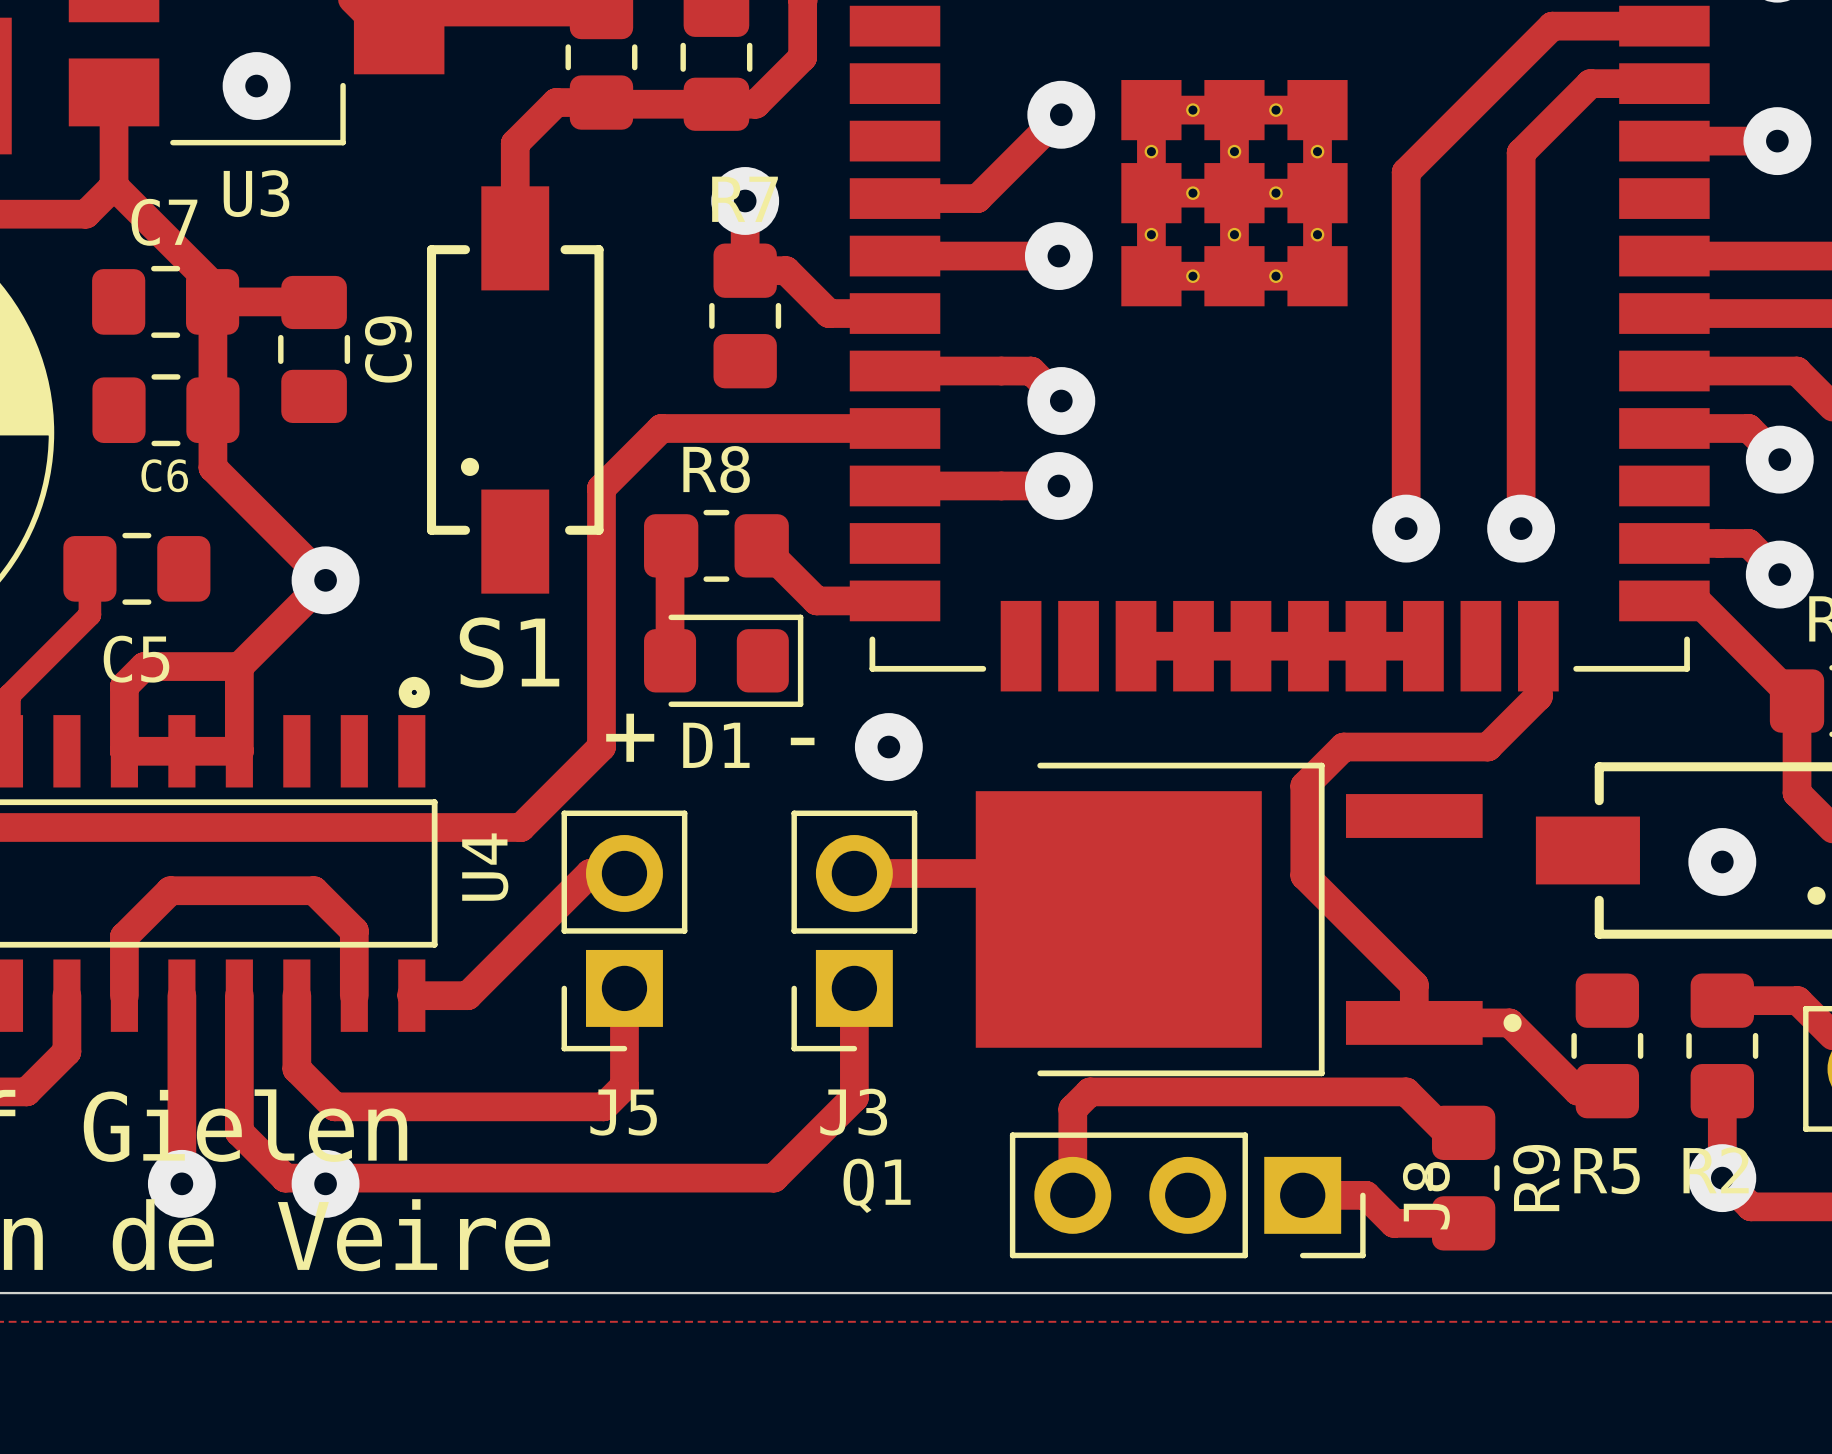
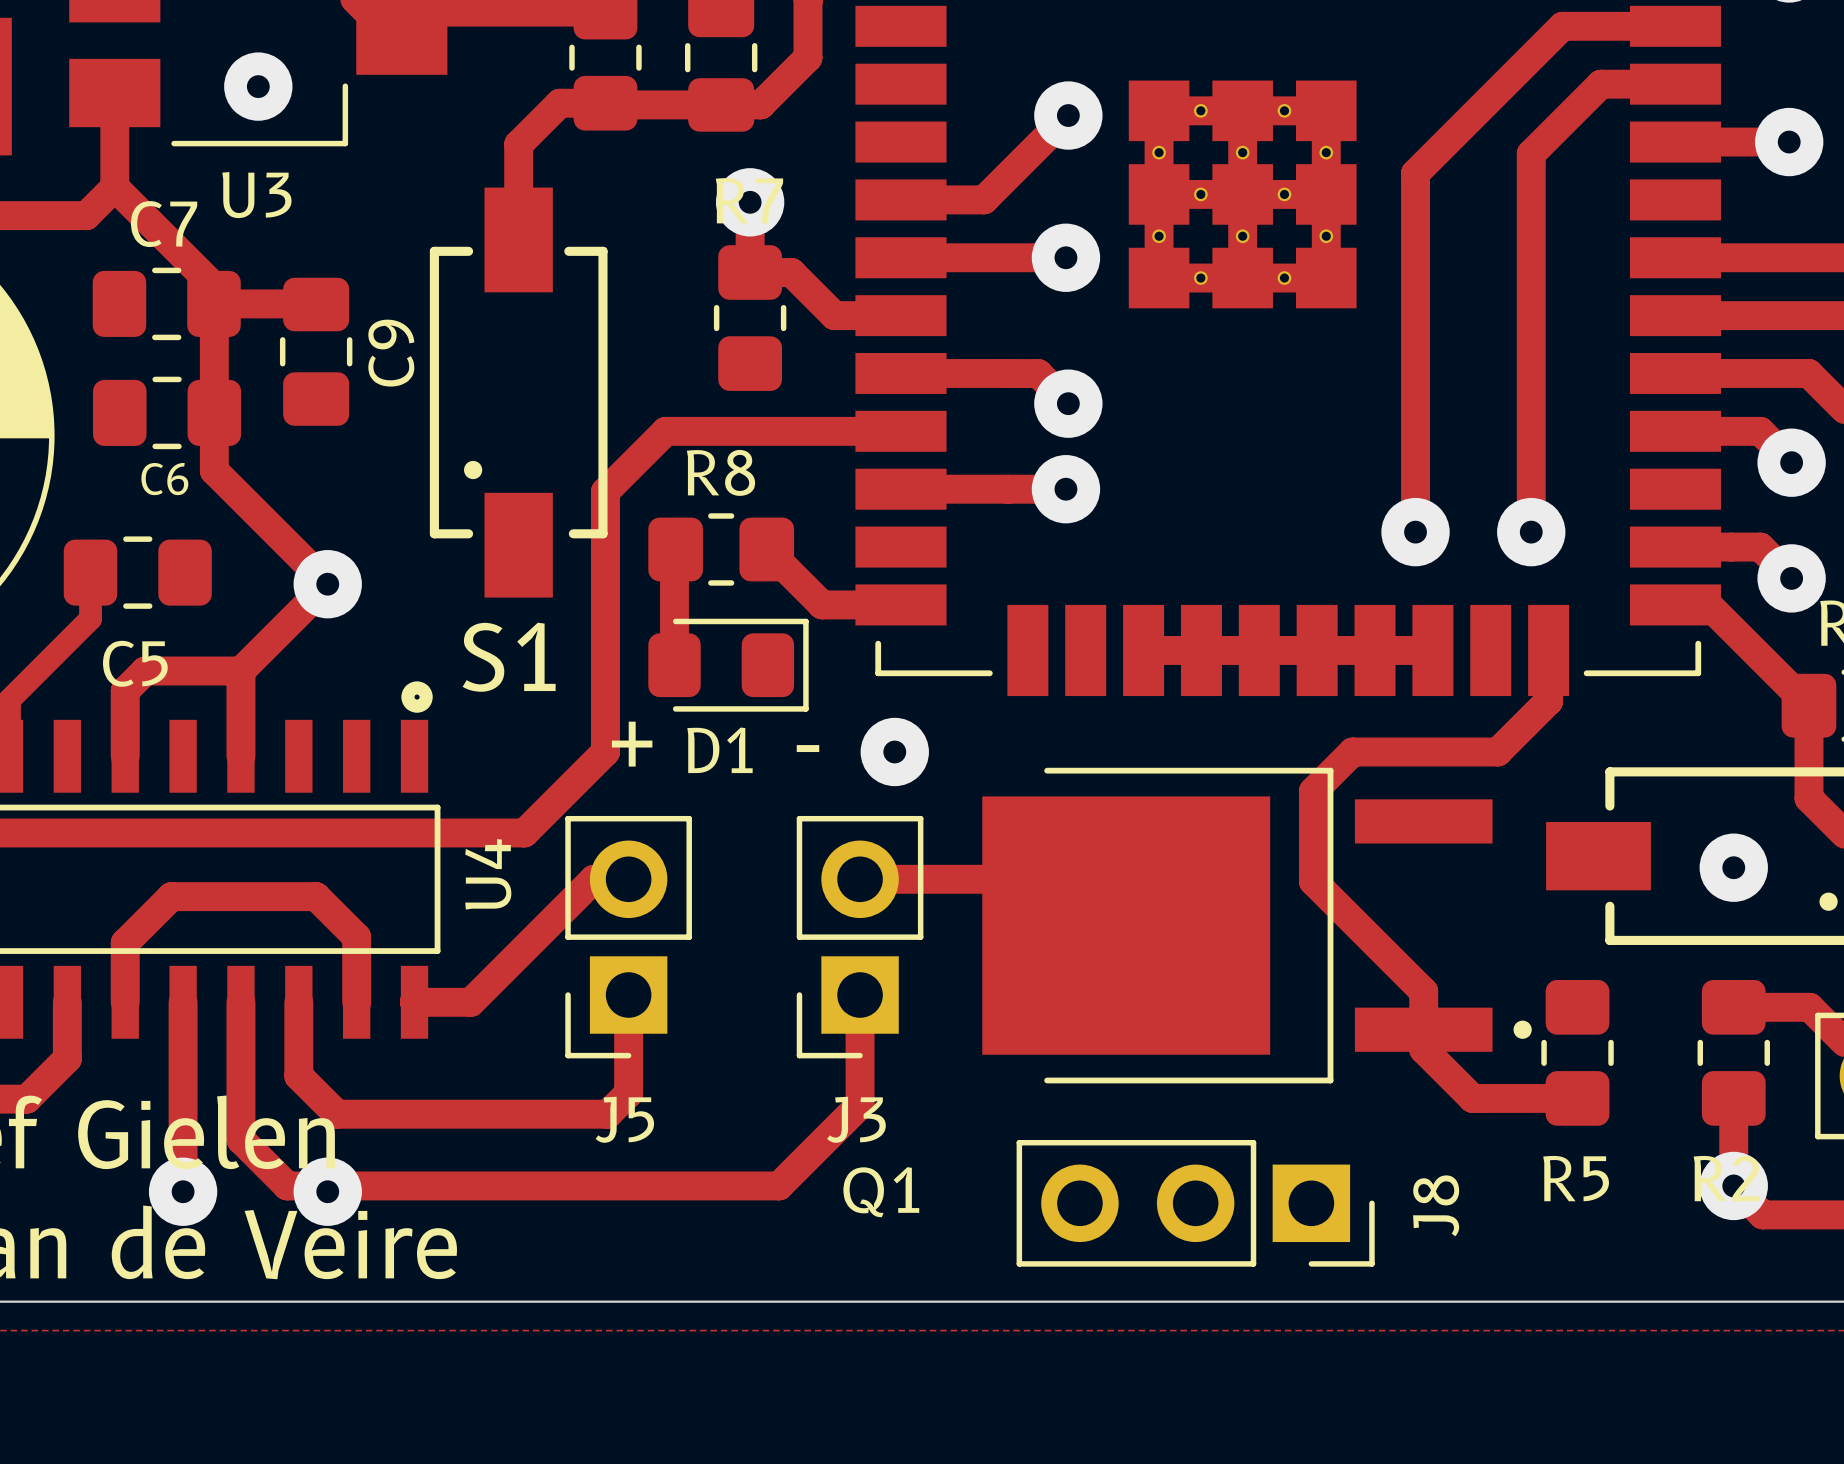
track: (124, 751) (239, 751) -> none
track: (1414, 1022) (1509, 1022) (1577, 1091) (1607, 1091) -> (1423, 1029) (1423, 1049) (1472, 1098) (1577, 1098)
R5 position: (1607, 1045) -> (1577, 1052)
track: (1463, 1132) (1447, 1132) (1406, 1091) (1090, 1091) (1072, 1109) (1072, 1195) -> none
R9: (1463, 1178) -> none
track: (1302, 1195) (1365, 1195) (1393, 1223) (1463, 1223) -> none

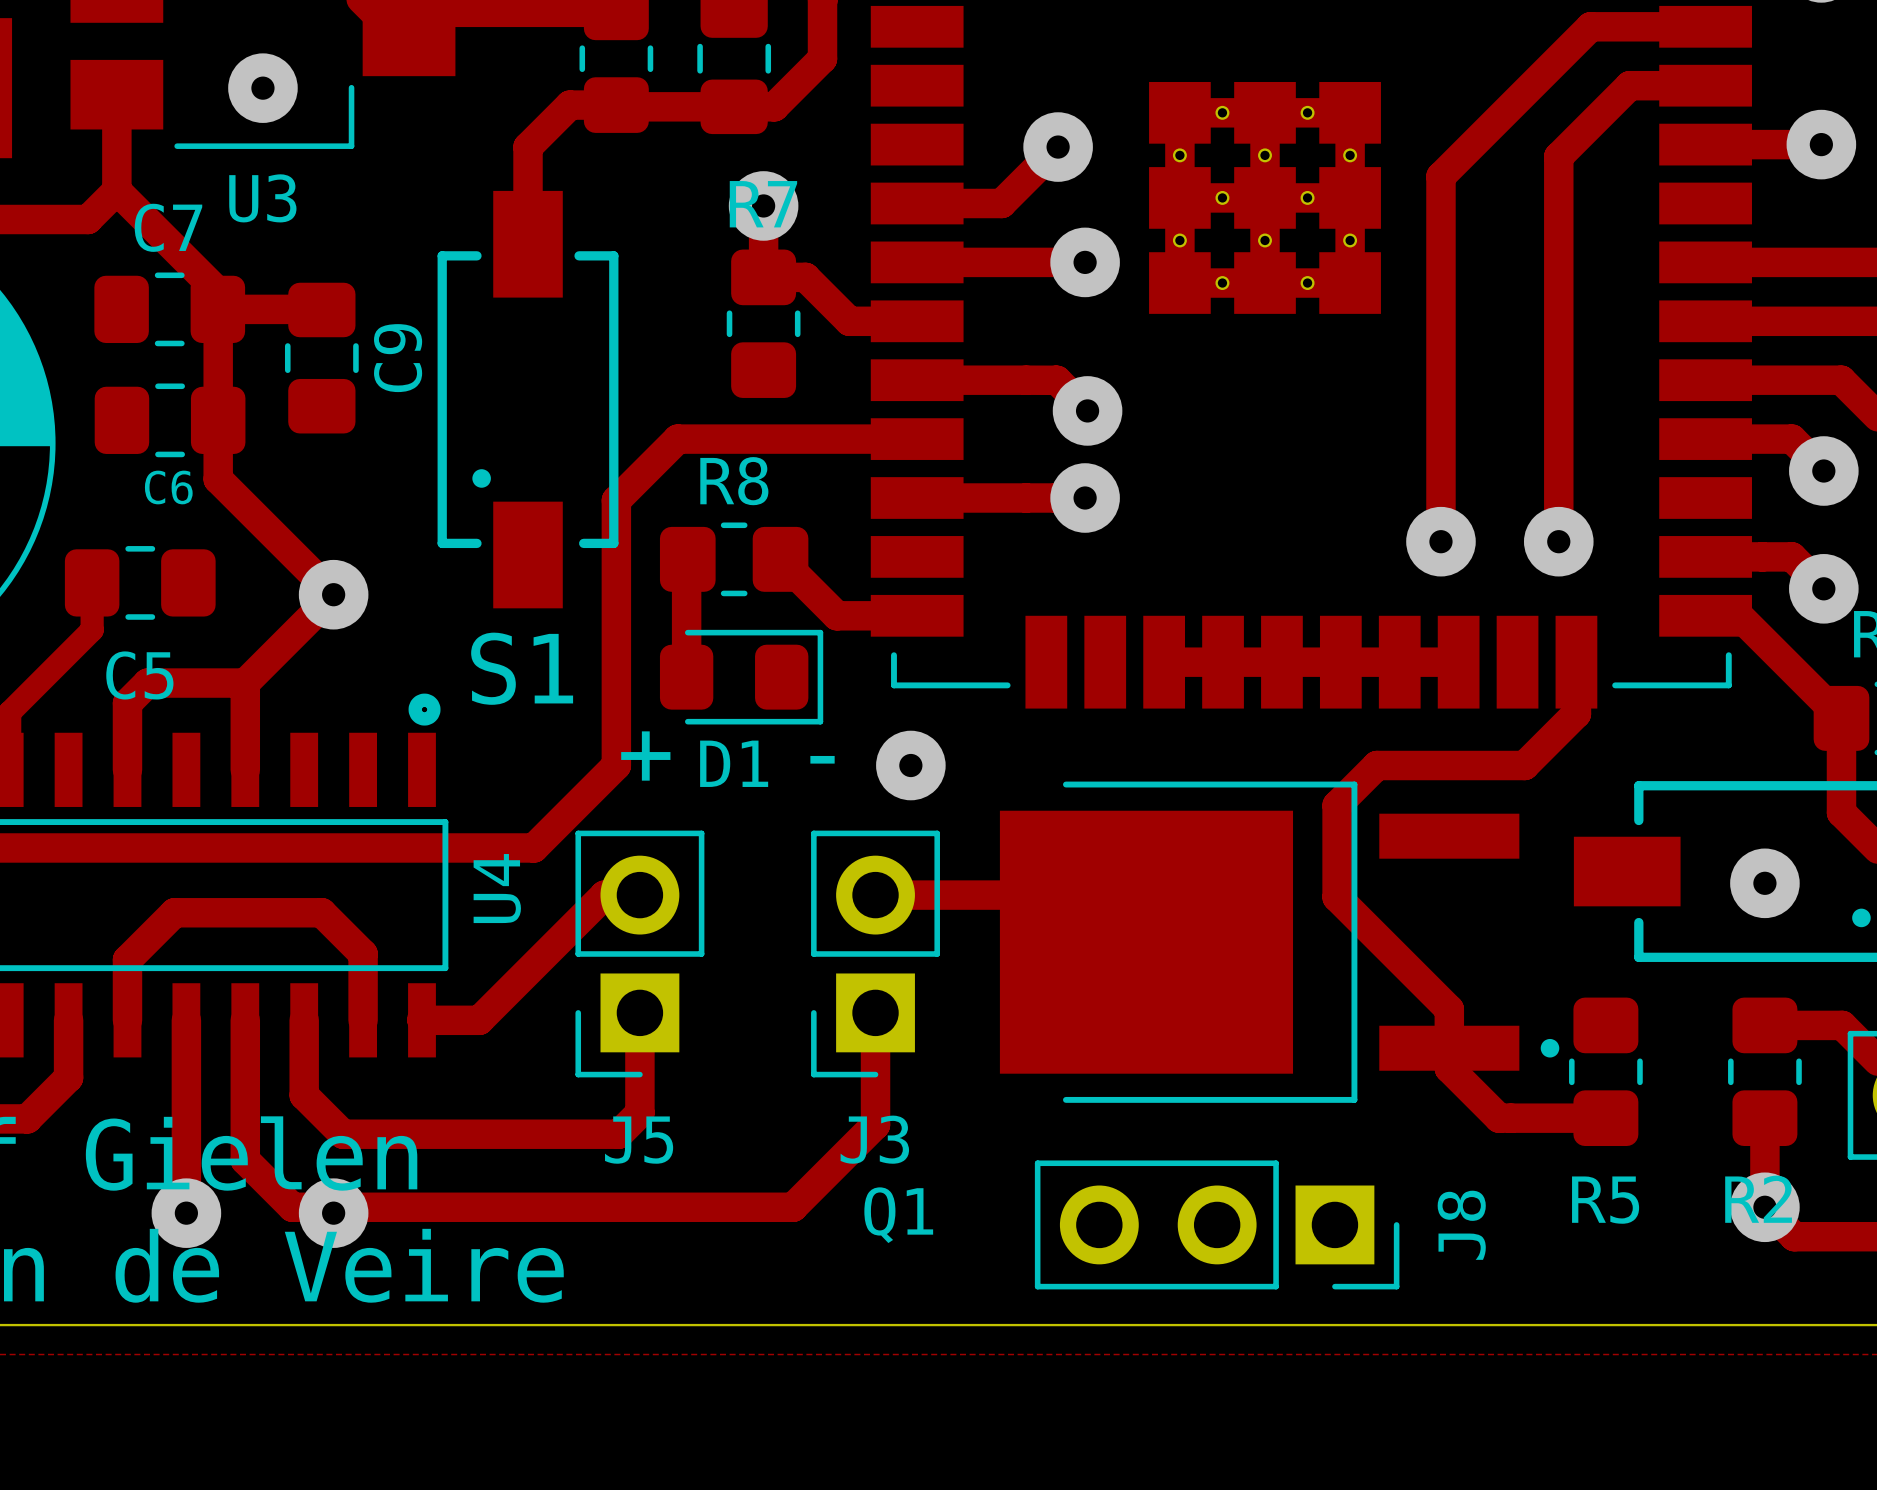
via position: (1068, 115) -> (1058, 147)

